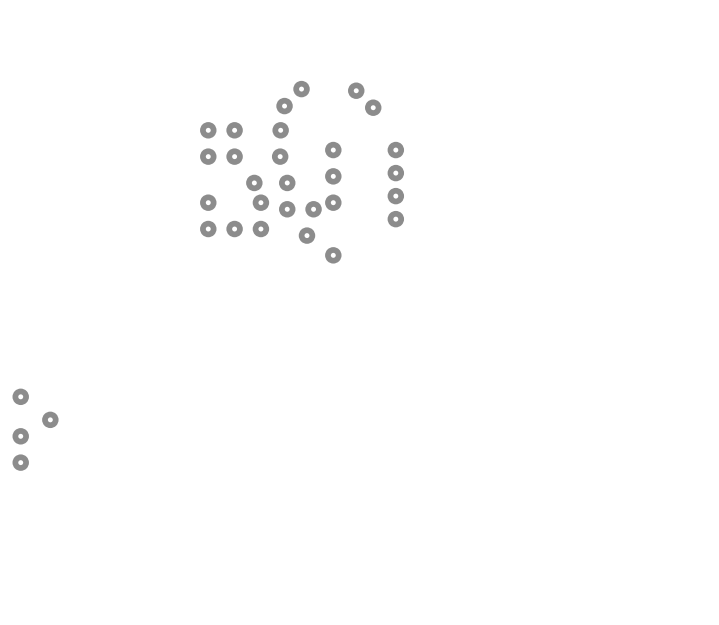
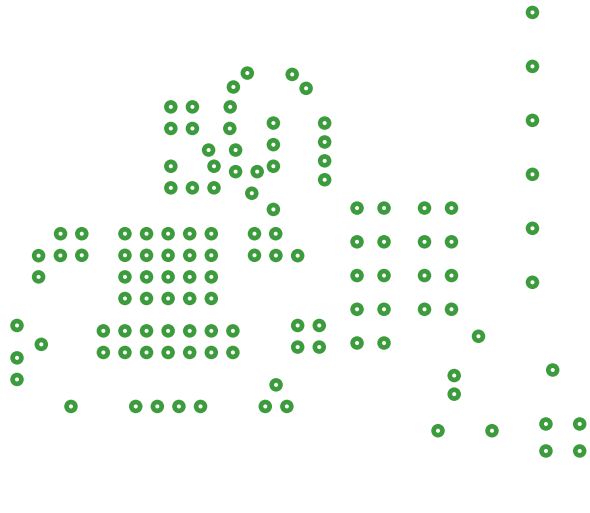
via: none -> (532, 12)
via: none -> (532, 66)
via: none -> (532, 120)
via: none -> (532, 174)
via: none -> (357, 208)
via: none -> (384, 208)
via: none -> (424, 208)
via: none -> (451, 208)
via: none -> (532, 228)
via: none -> (60, 233)
via: none -> (81, 233)
via: none -> (124, 233)
via: none -> (146, 233)
via: none -> (168, 233)
via: none -> (189, 233)
via: none -> (211, 233)
via: none -> (254, 233)
via: none -> (275, 233)
via: none -> (357, 241)
via: none -> (384, 241)
via: none -> (424, 241)
via: none -> (451, 241)
via: none -> (38, 255)
via: none -> (60, 255)
via: none -> (81, 255)
via: none -> (124, 255)
via: none -> (146, 255)
via: none -> (168, 255)
via: none -> (189, 255)
via: none -> (211, 255)
via: none -> (254, 255)
via: none -> (275, 255)
via: none -> (297, 255)
via: none -> (357, 275)
via: none -> (384, 275)
via: none -> (424, 275)
via: none -> (451, 275)
via: none -> (38, 276)
via: none -> (124, 276)
via: none -> (146, 276)
via: none -> (168, 276)
via: none -> (189, 276)
via: none -> (211, 276)
via: none -> (532, 282)
via: none -> (124, 298)
via: none -> (146, 298)
via: none -> (168, 298)
via: none -> (189, 298)
via: none -> (211, 298)
via: none -> (357, 309)
via: none -> (384, 309)
via: none -> (424, 309)
via: none -> (451, 309)
via: none -> (297, 325)
via: none -> (319, 325)
via: none -> (103, 330)
via: none -> (124, 330)
via: none -> (146, 330)
via: none -> (168, 330)
via: none -> (189, 330)
via: none -> (211, 330)
via: none -> (232, 330)
via: none -> (478, 336)
via: none -> (357, 343)
via: none -> (384, 343)
via: none -> (297, 347)
via: none -> (319, 347)
via: none -> (103, 352)
via: none -> (124, 352)
via: none -> (146, 352)
via: none -> (168, 352)
via: none -> (189, 352)
via: none -> (211, 352)
via: none -> (232, 352)
via: none -> (552, 370)
via: none -> (454, 375)
via: none -> (276, 384)
via: none -> (454, 394)
via: none -> (70, 406)
via: none -> (135, 406)
via: none -> (157, 406)
via: none -> (178, 406)
via: none -> (200, 406)
via: none -> (265, 406)
via: none -> (286, 406)
via: none -> (545, 423)
via: none -> (579, 423)
via: none -> (438, 430)
via: none -> (491, 430)
via: none -> (545, 450)
via: none -> (579, 450)

